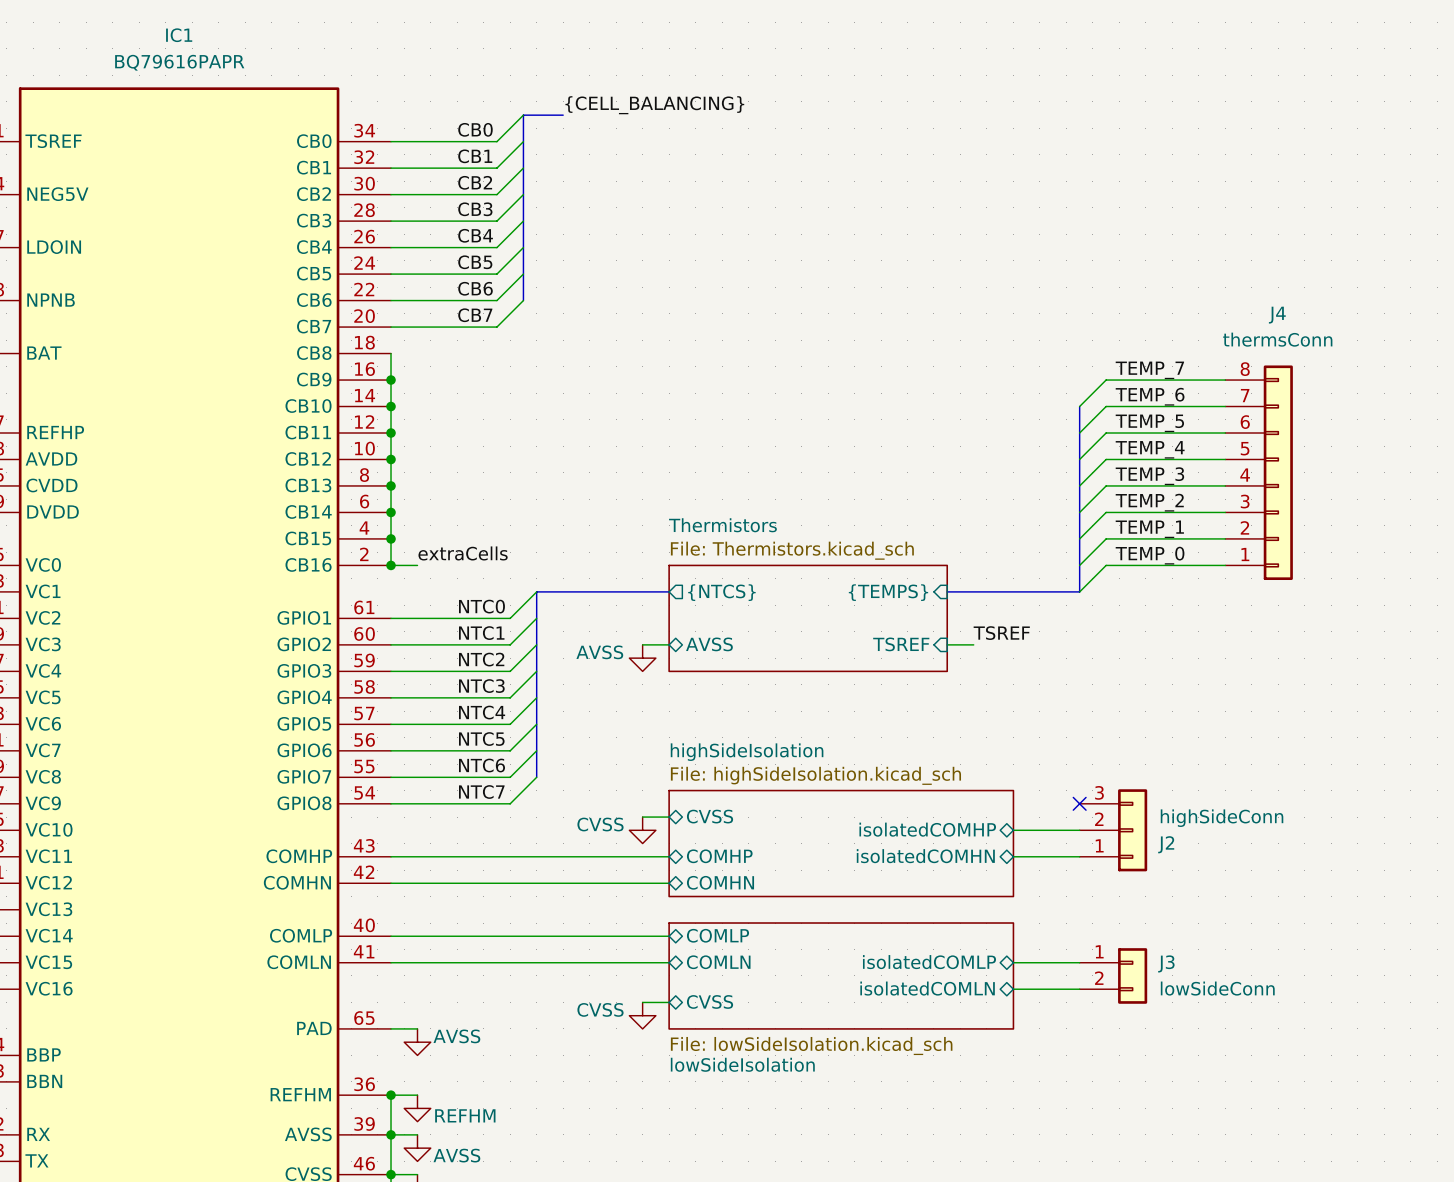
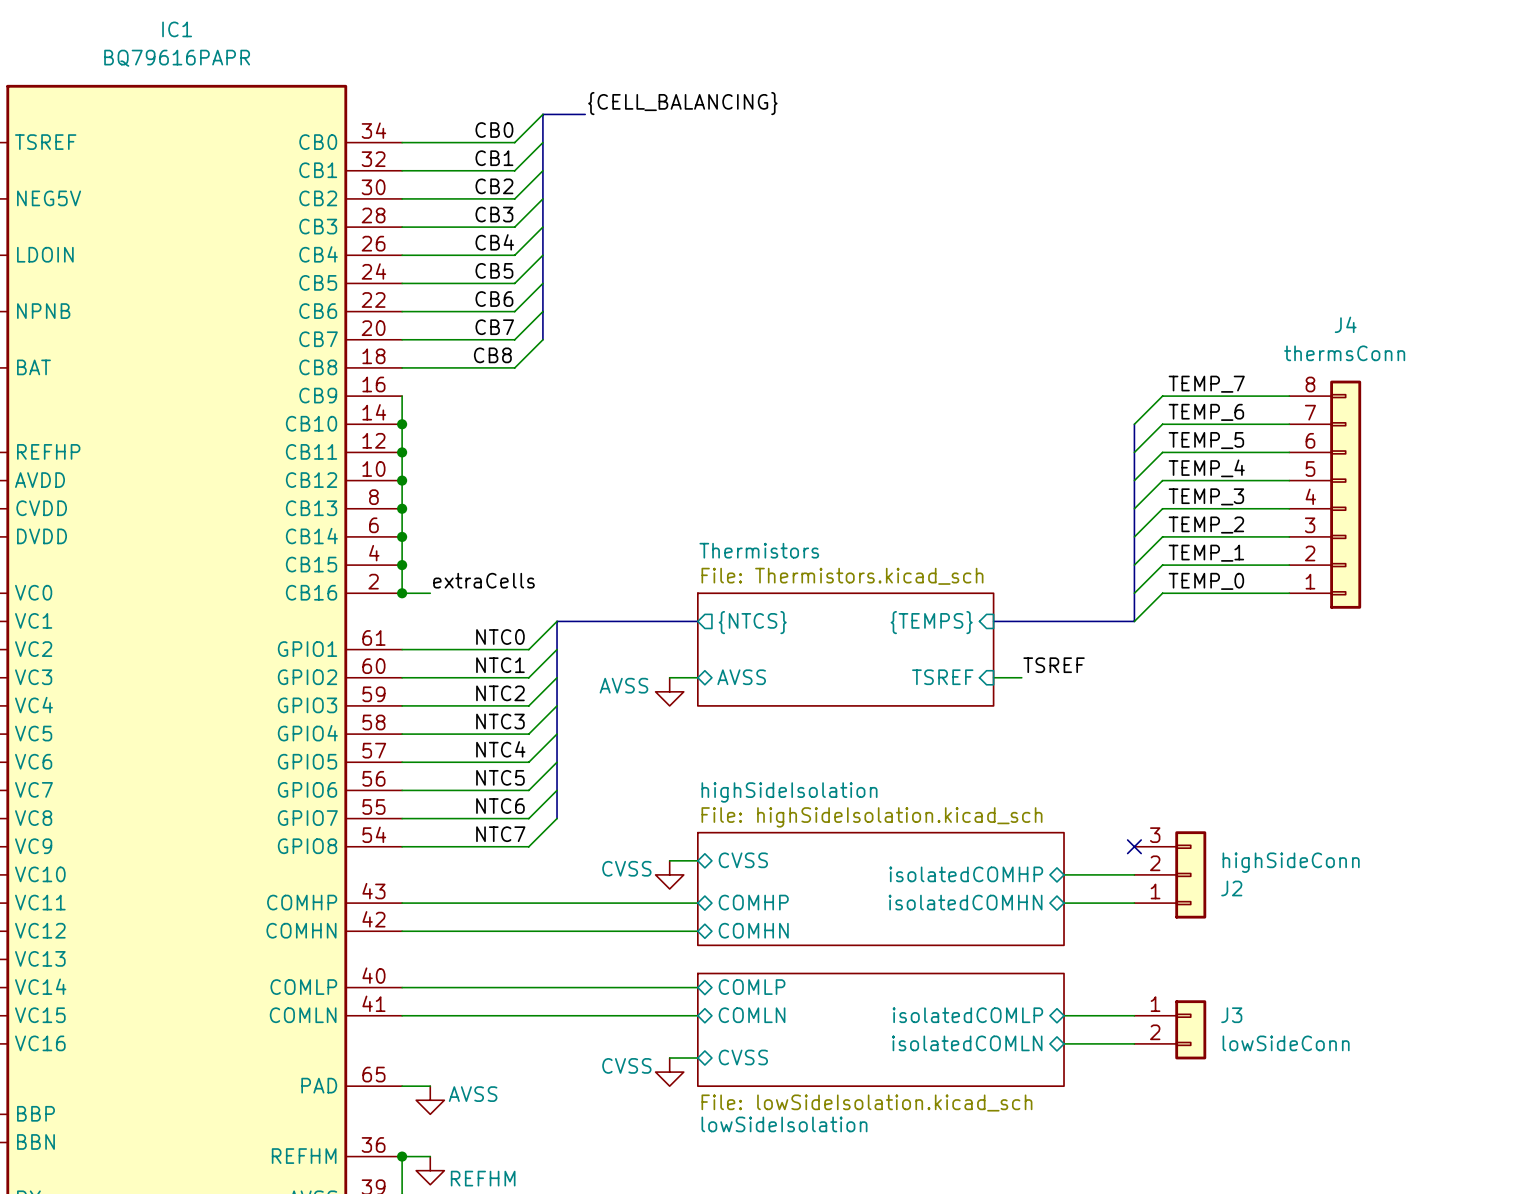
bus: none -> (542, 311) (542, 339)
label: none -> CB8 (492, 355)
wire: (391, 353) (391, 380) -> (402, 367) (514, 367) (542, 339)
junction: (391, 380) -> none

